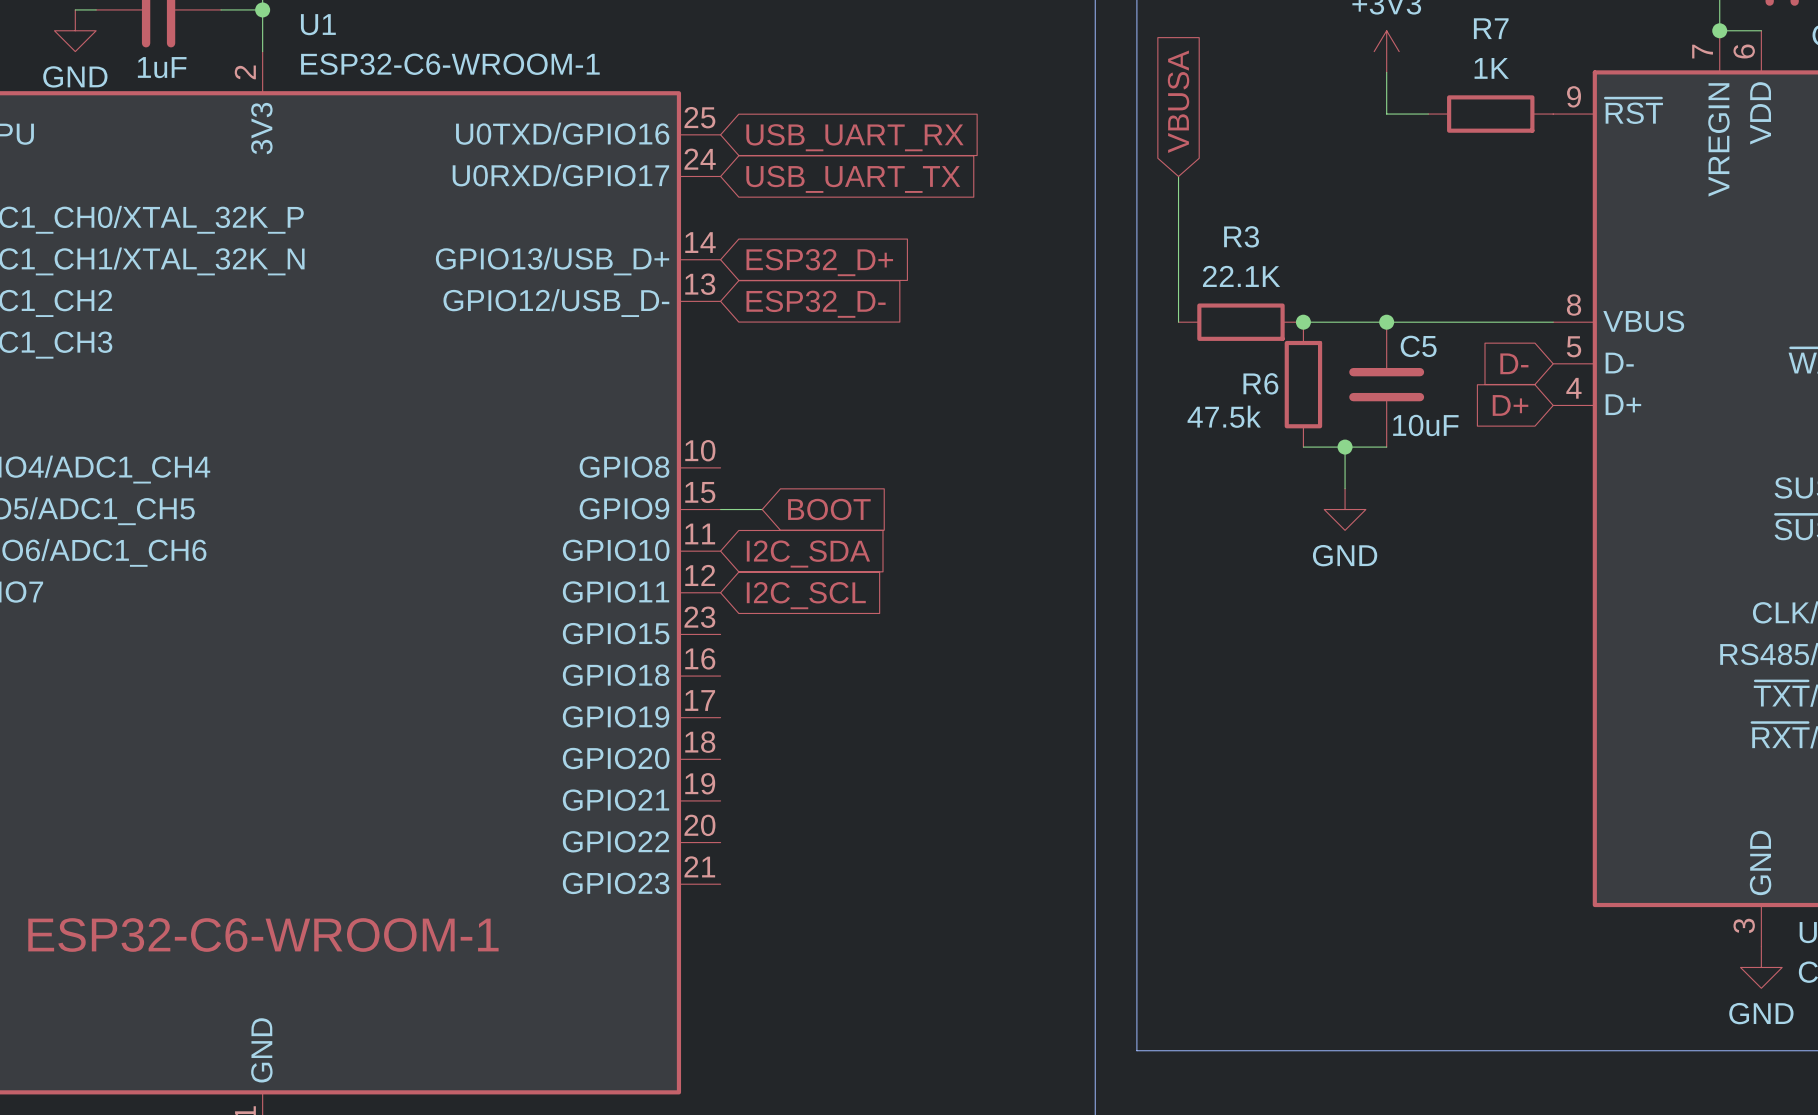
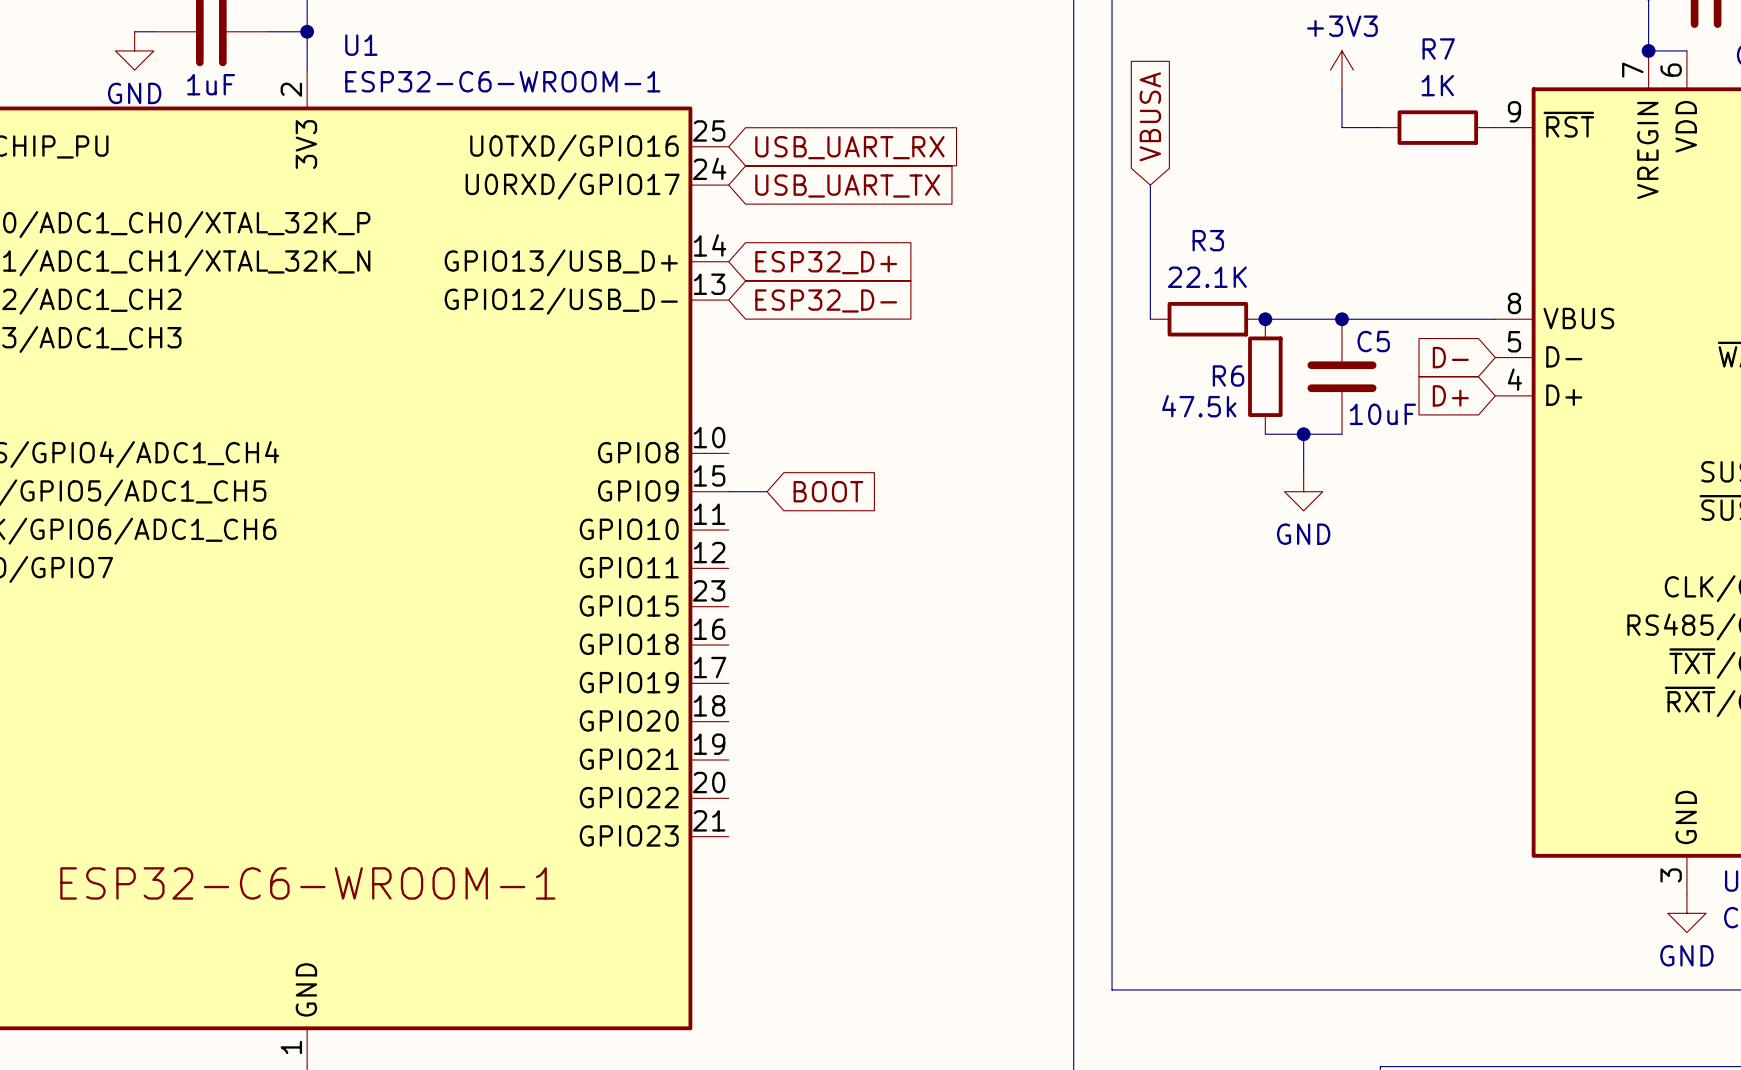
global label: I2C_SDA (808, 554) -> none
global label: I2C_SCL (806, 595) -> none

